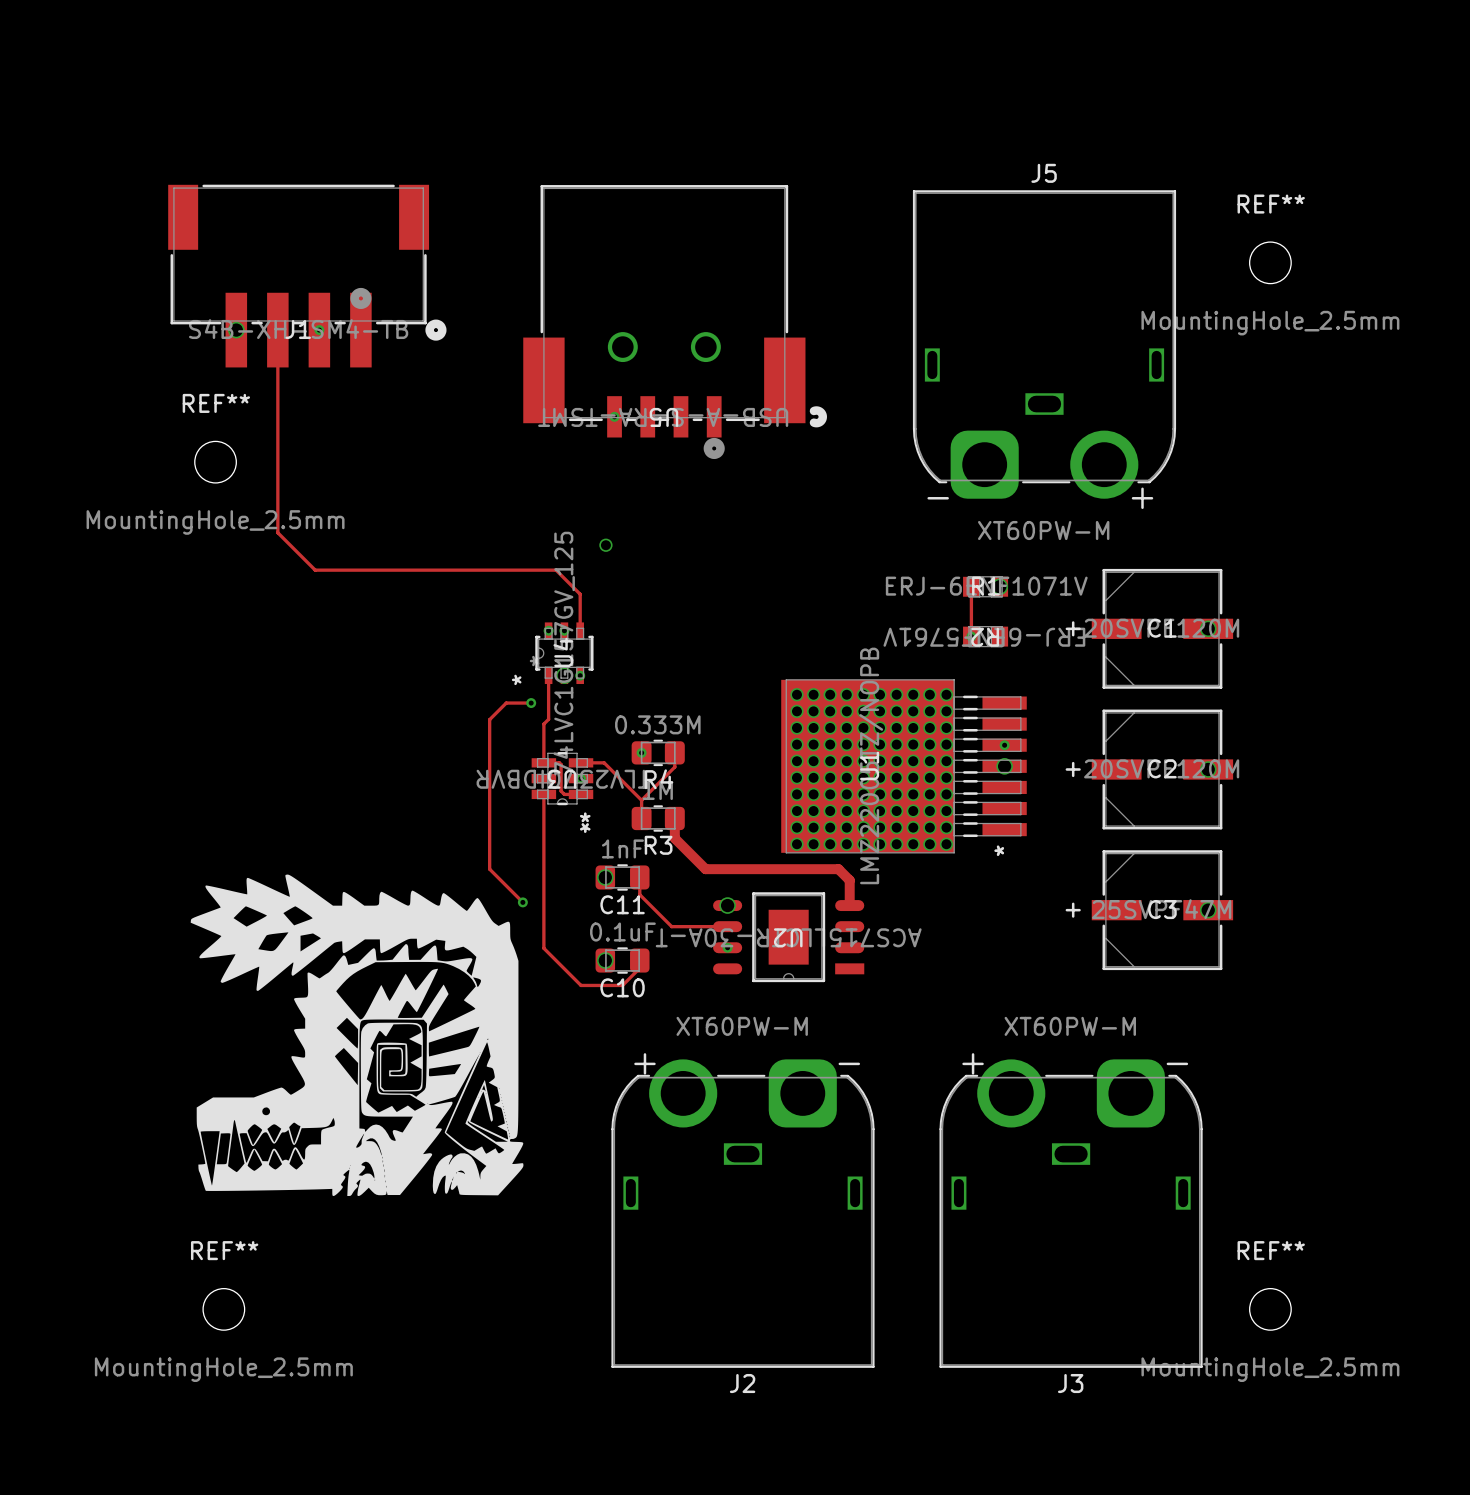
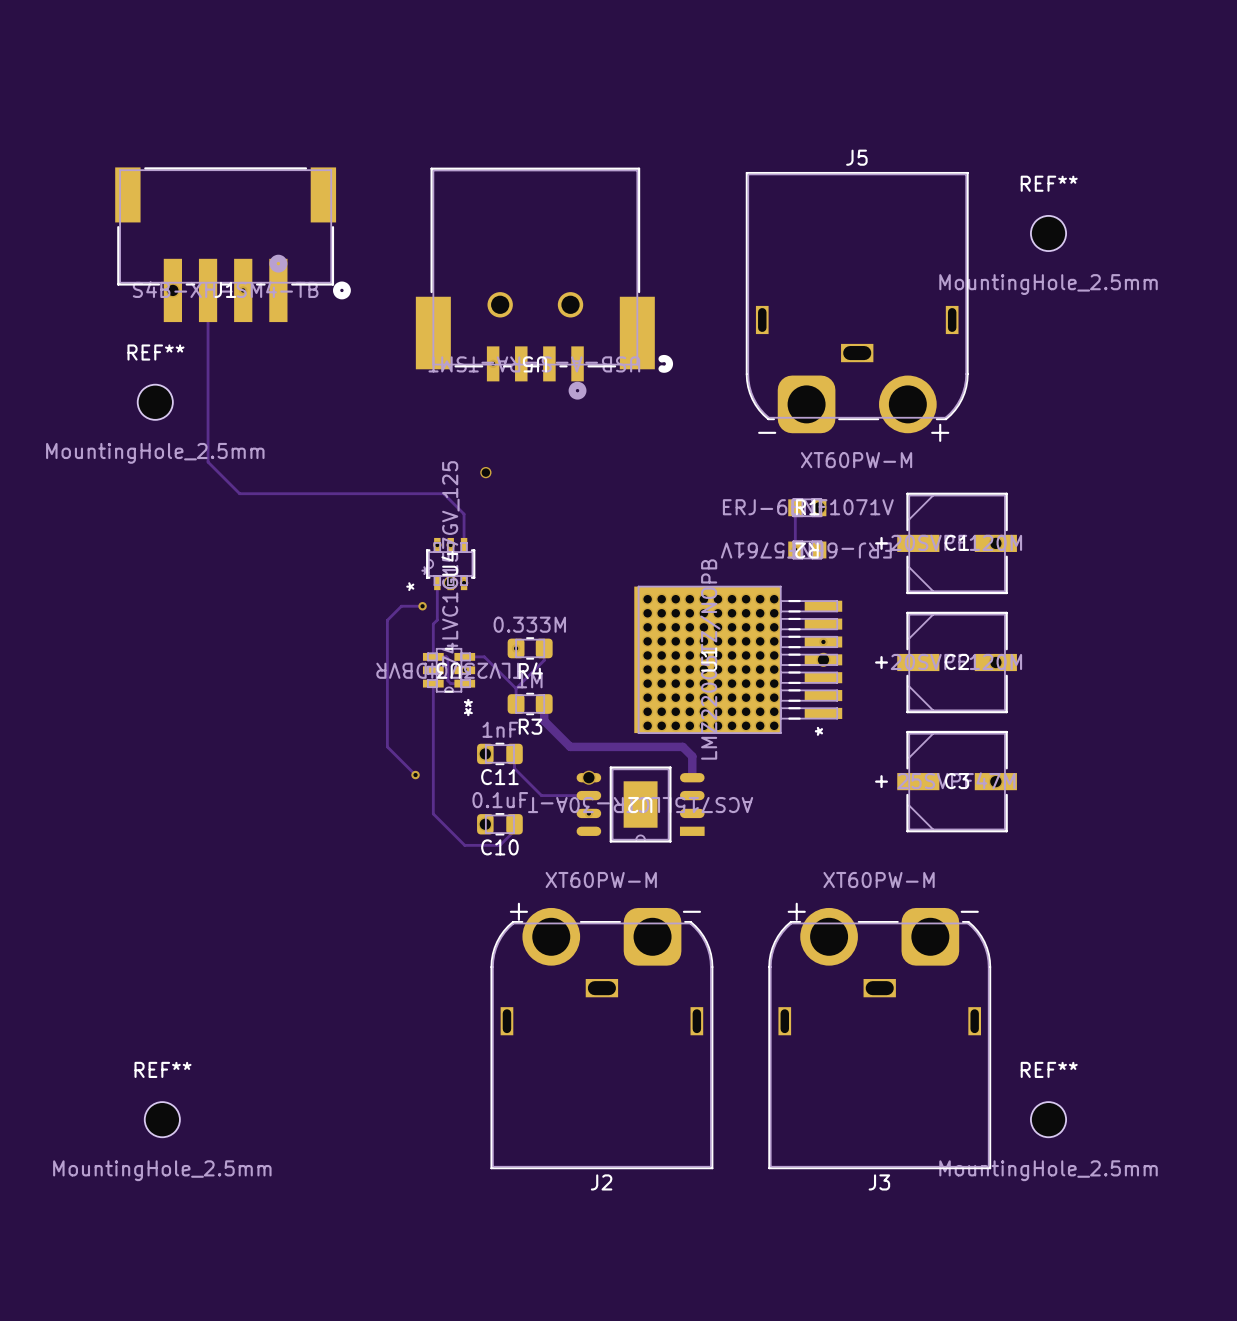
drawing: [190, 874, 524, 1197] -> none

